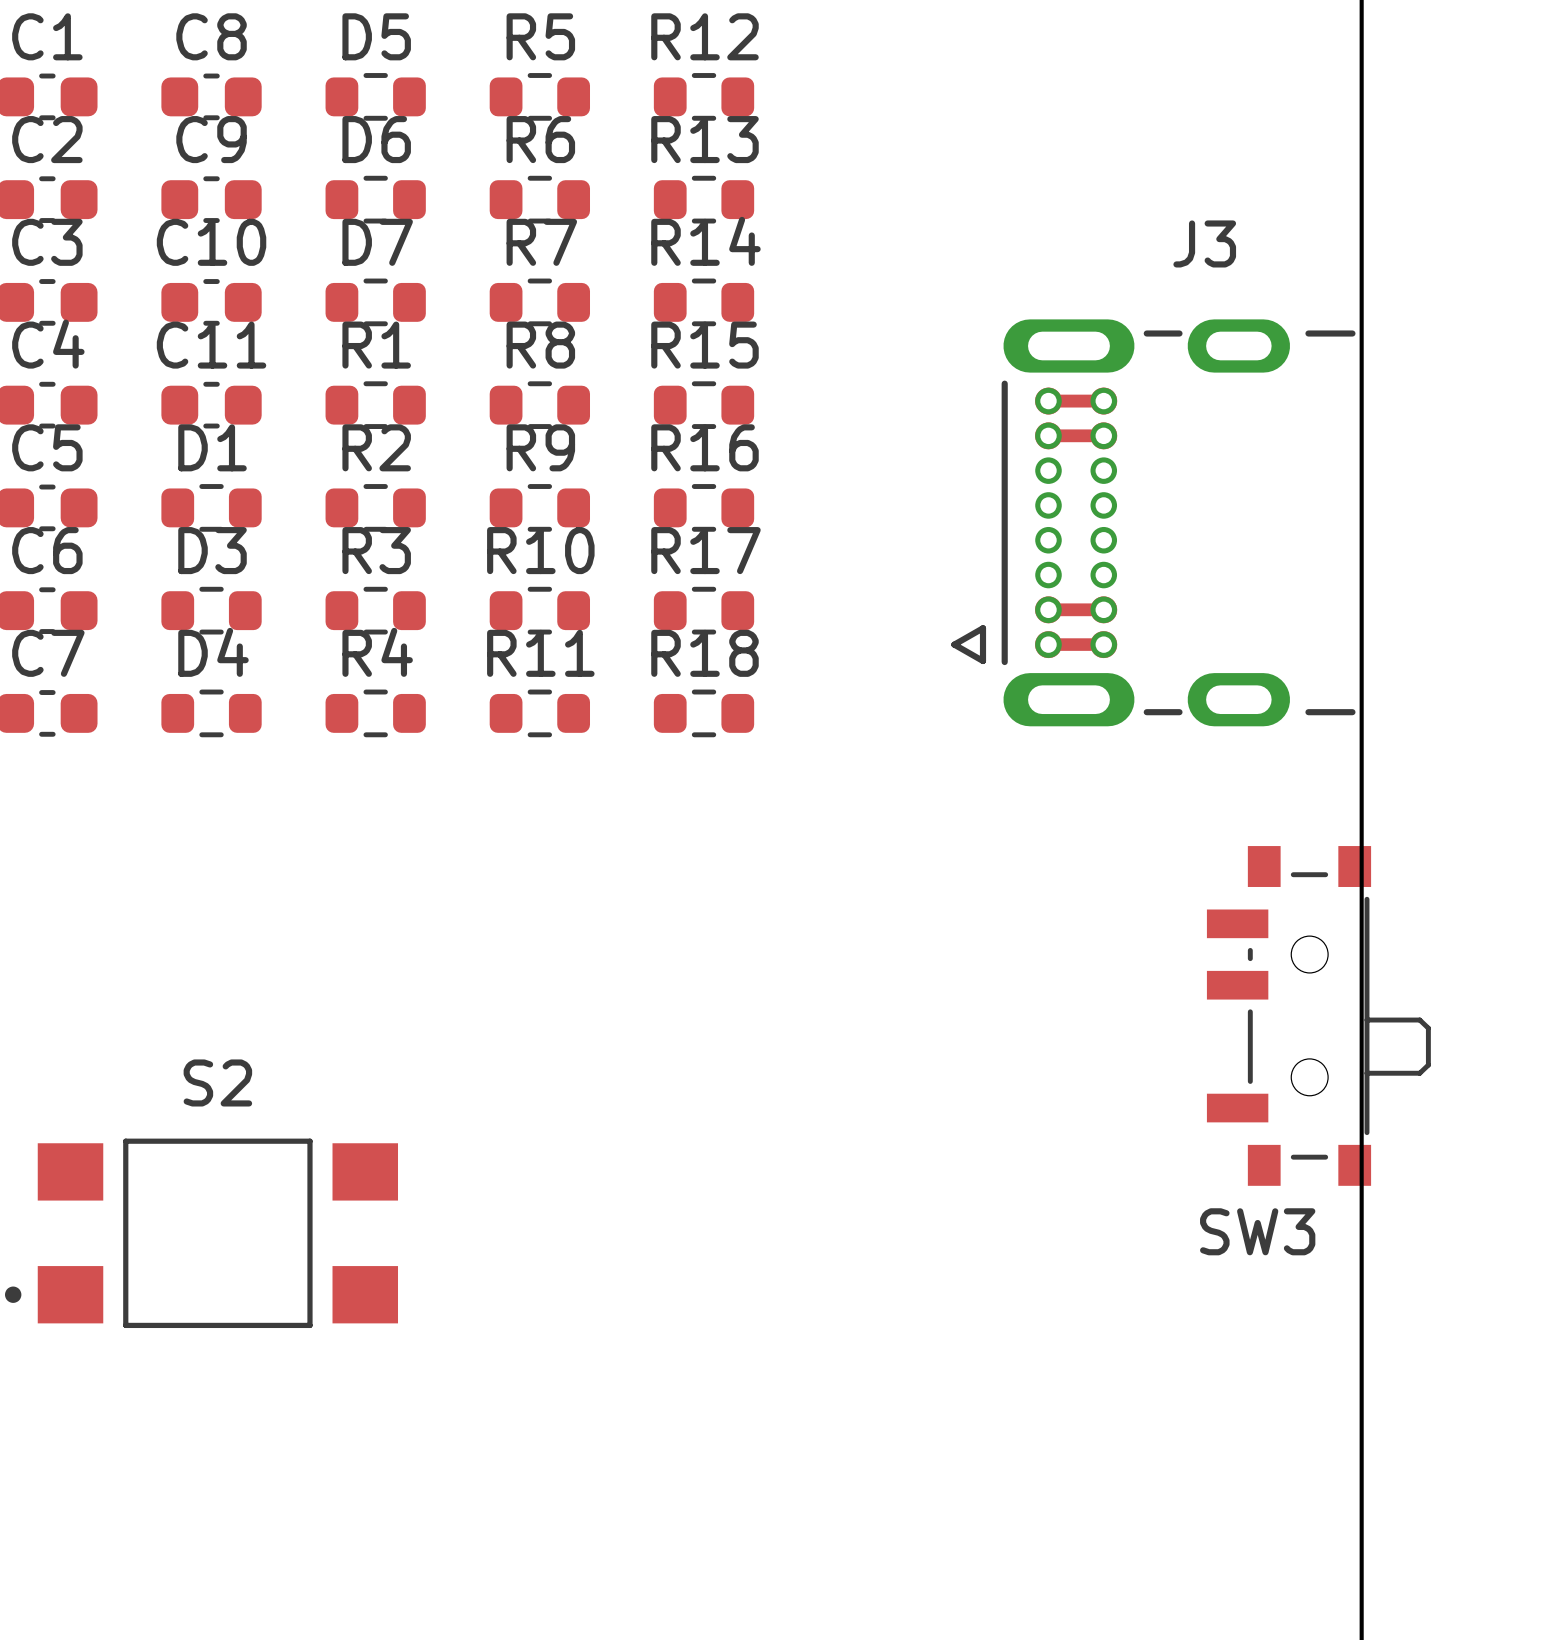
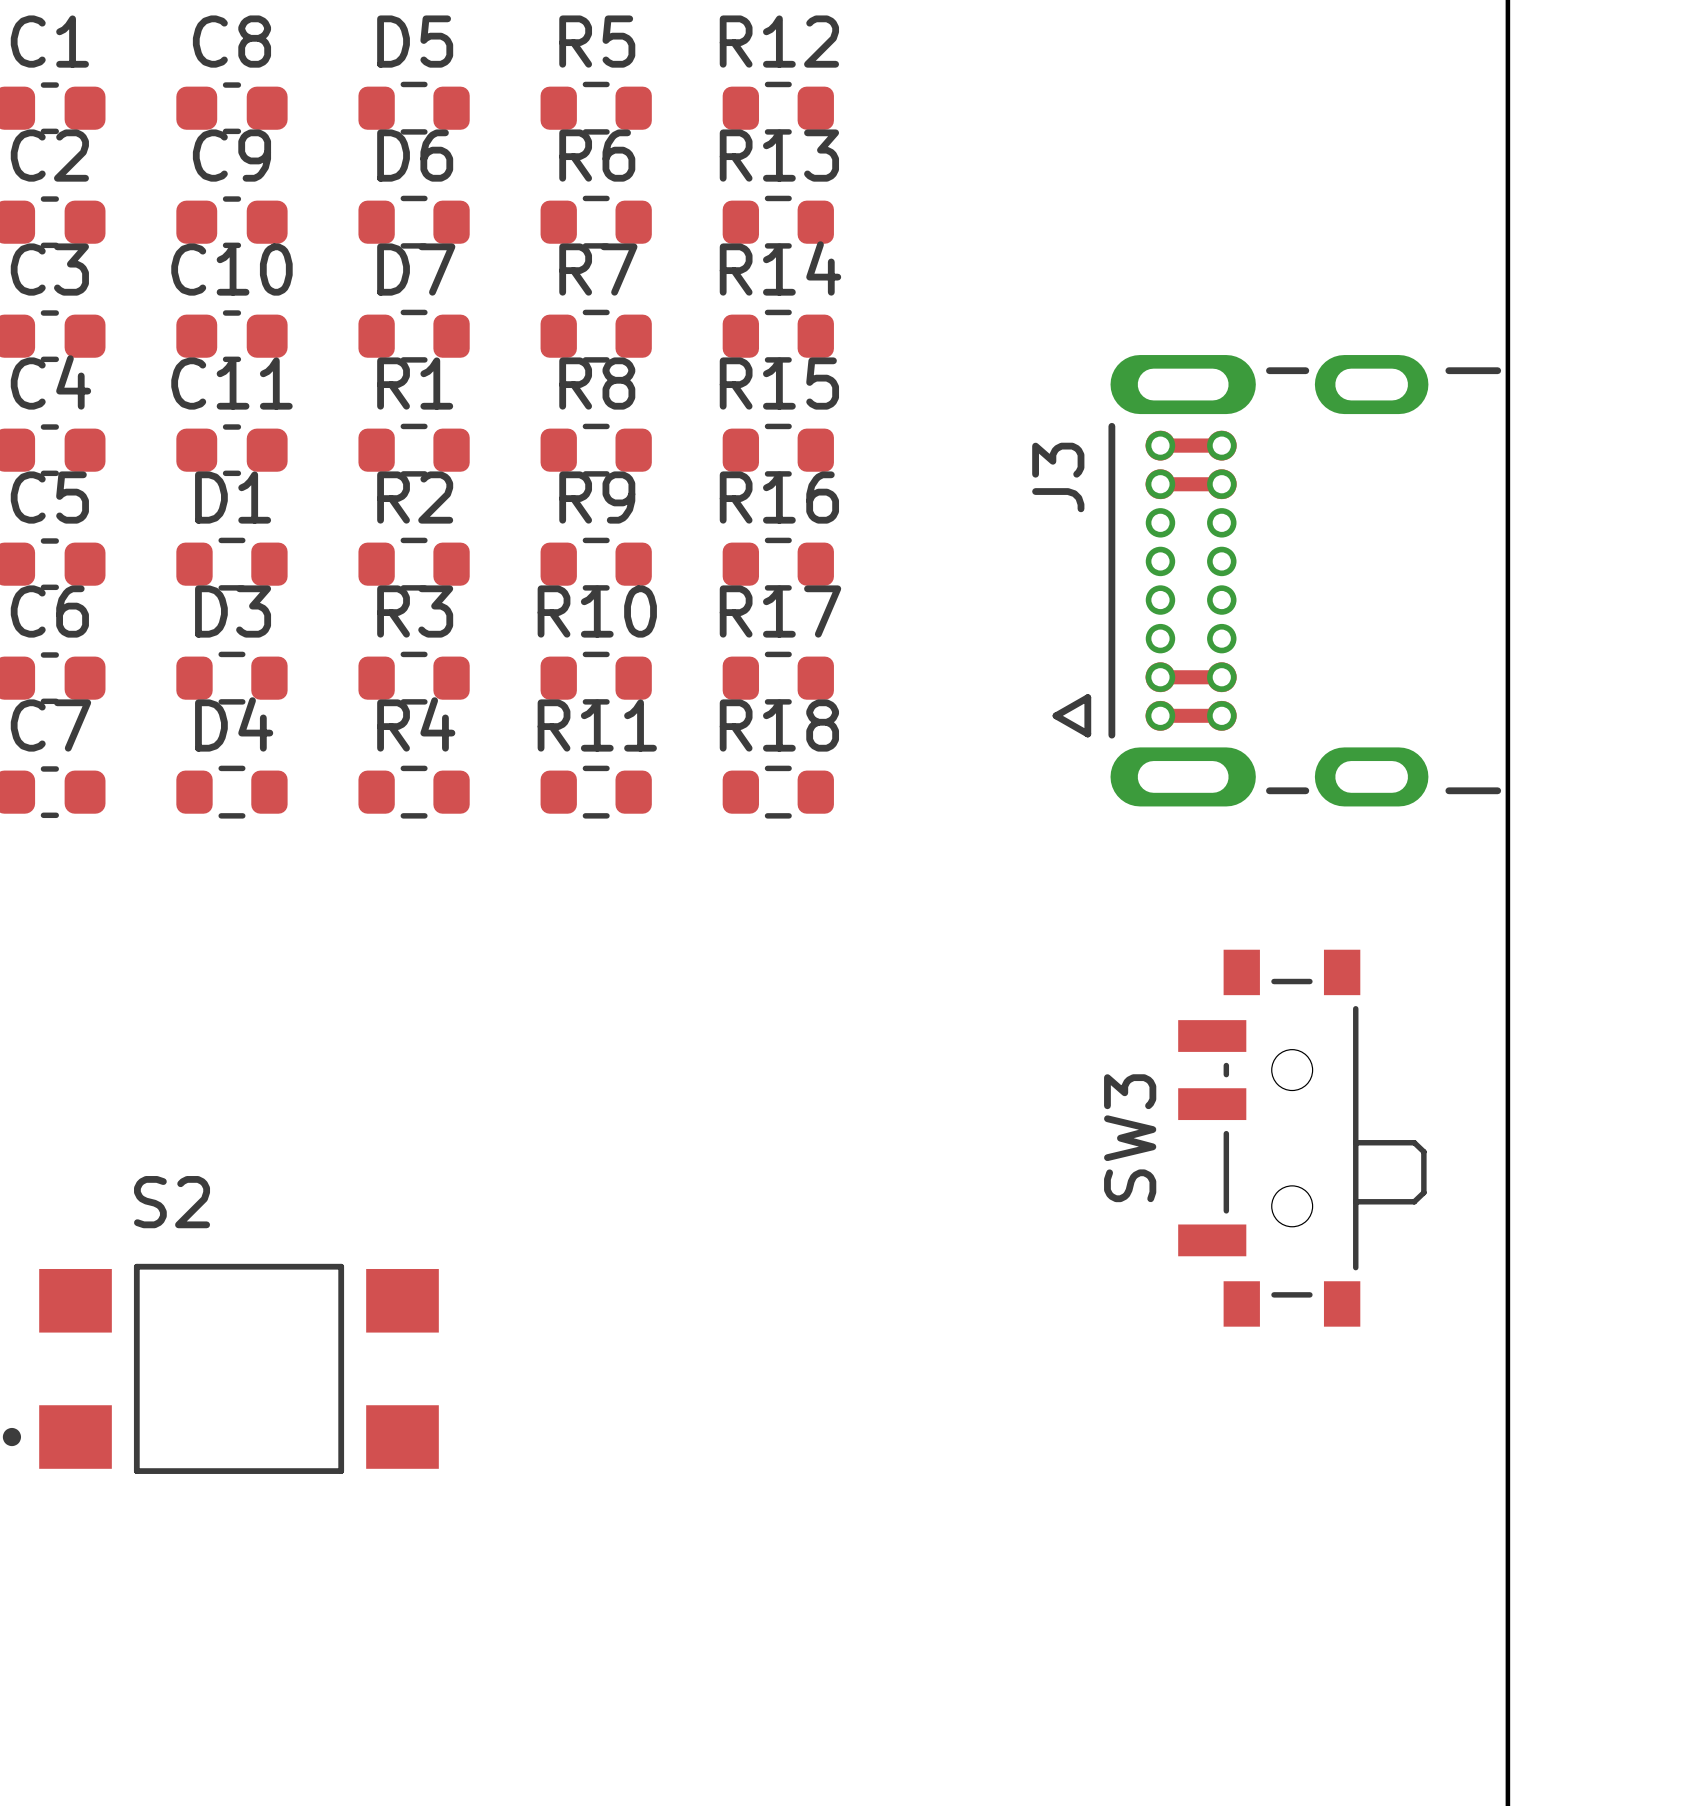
J3 name rotation: 0° (1204, 243) -> 90° counterclockwise (1058, 477)
J3 name position: J3 (1204, 243) -> J3 (1058, 477)
SW3 position: (1318, 1015) -> (1302, 1138)
S2 name position: S2 (217, 1082) -> S2 (172, 1202)
SW3 name rotation: 0° (1257, 1231) -> 90° counterclockwise (1130, 1138)
SW3 name position: SW3 (1257, 1231) -> SW3 (1130, 1138)

